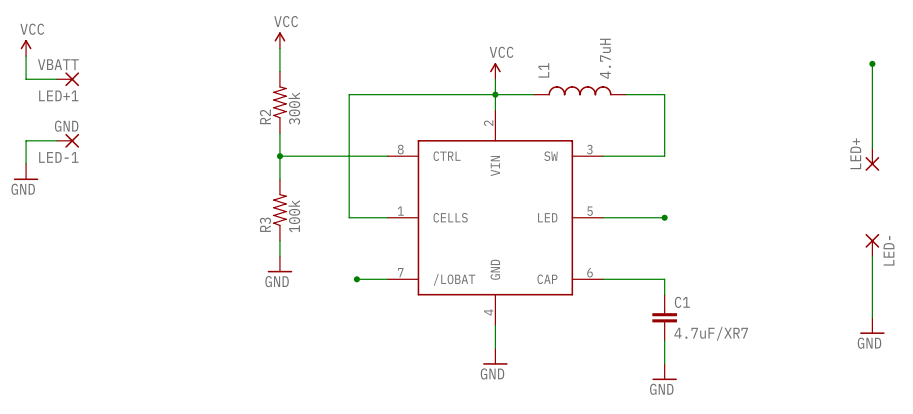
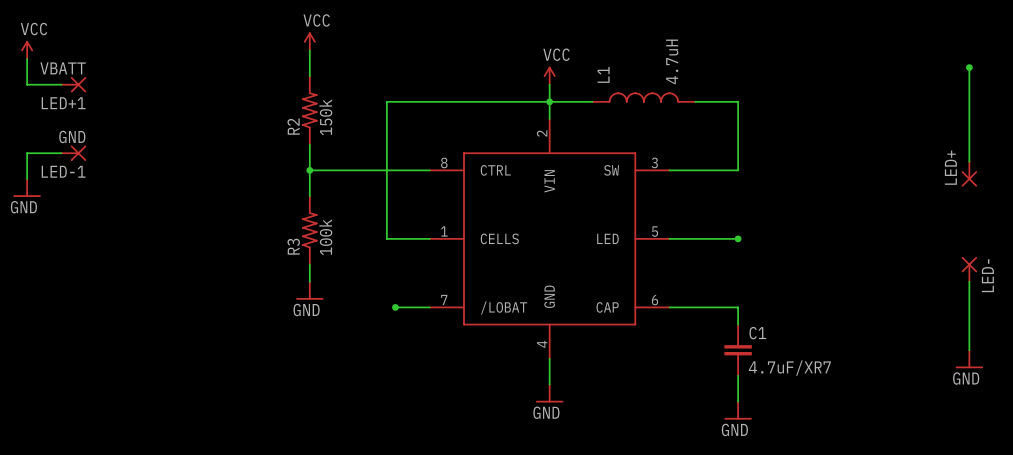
R2 value: 300k (294, 108) -> 150k (325, 117)

